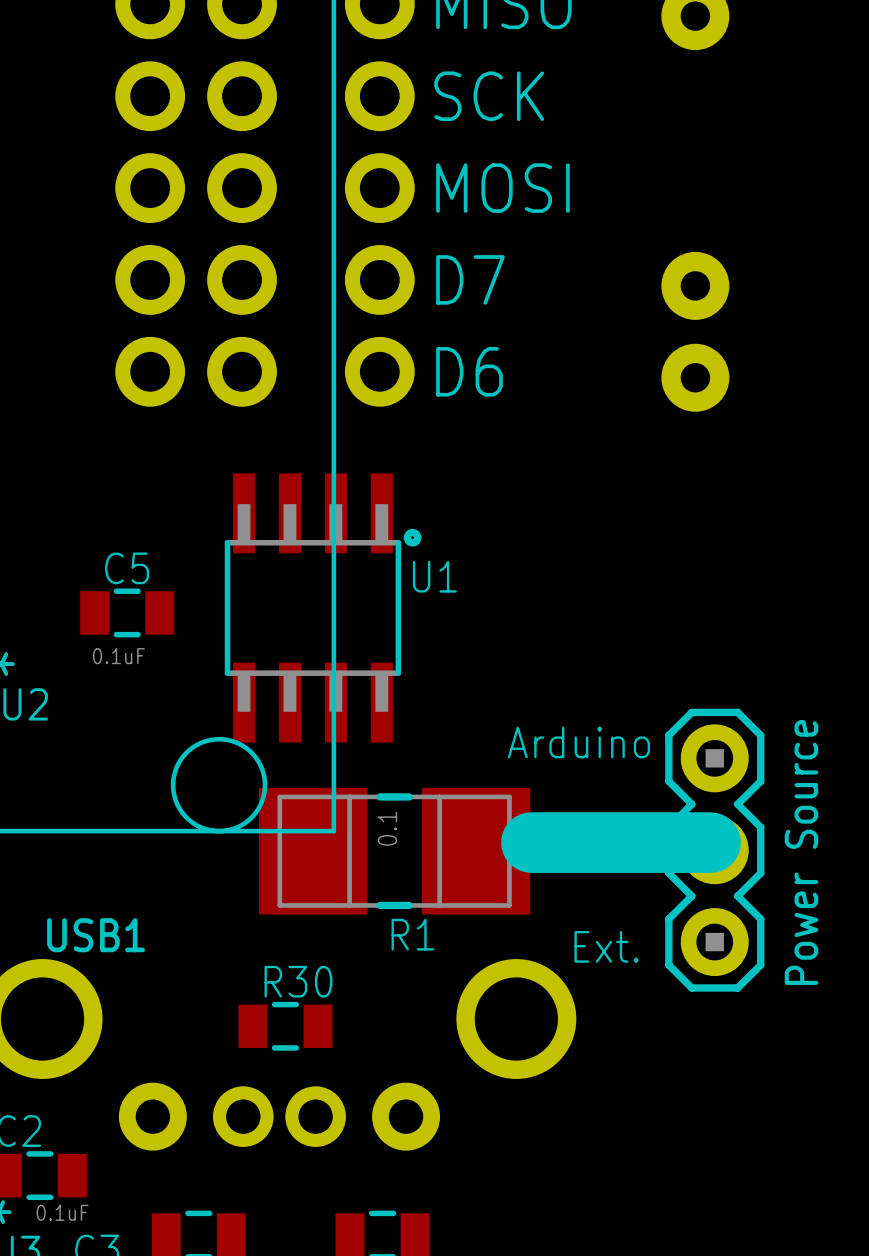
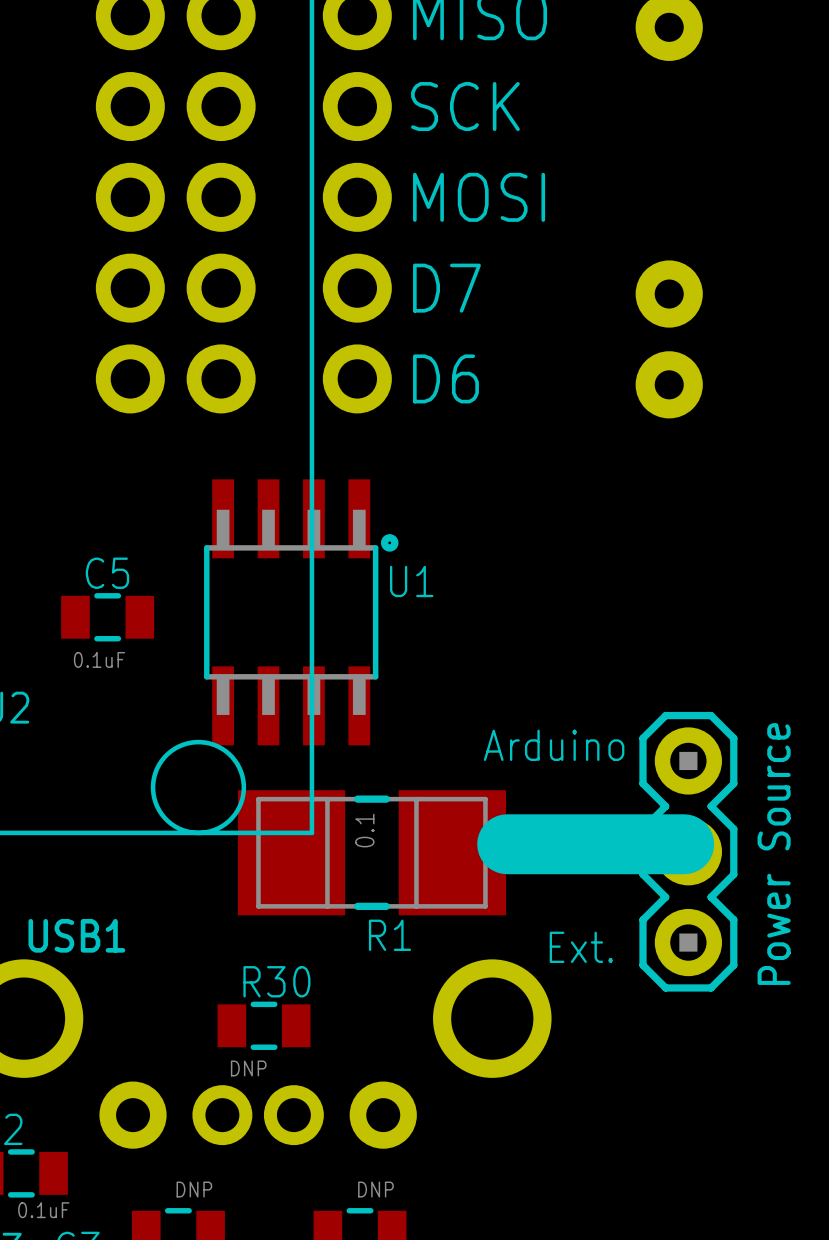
R30 value: none -> DNP (248, 1068)
part value: none -> DNP (194, 1189)
part value: none -> DNP (375, 1189)

